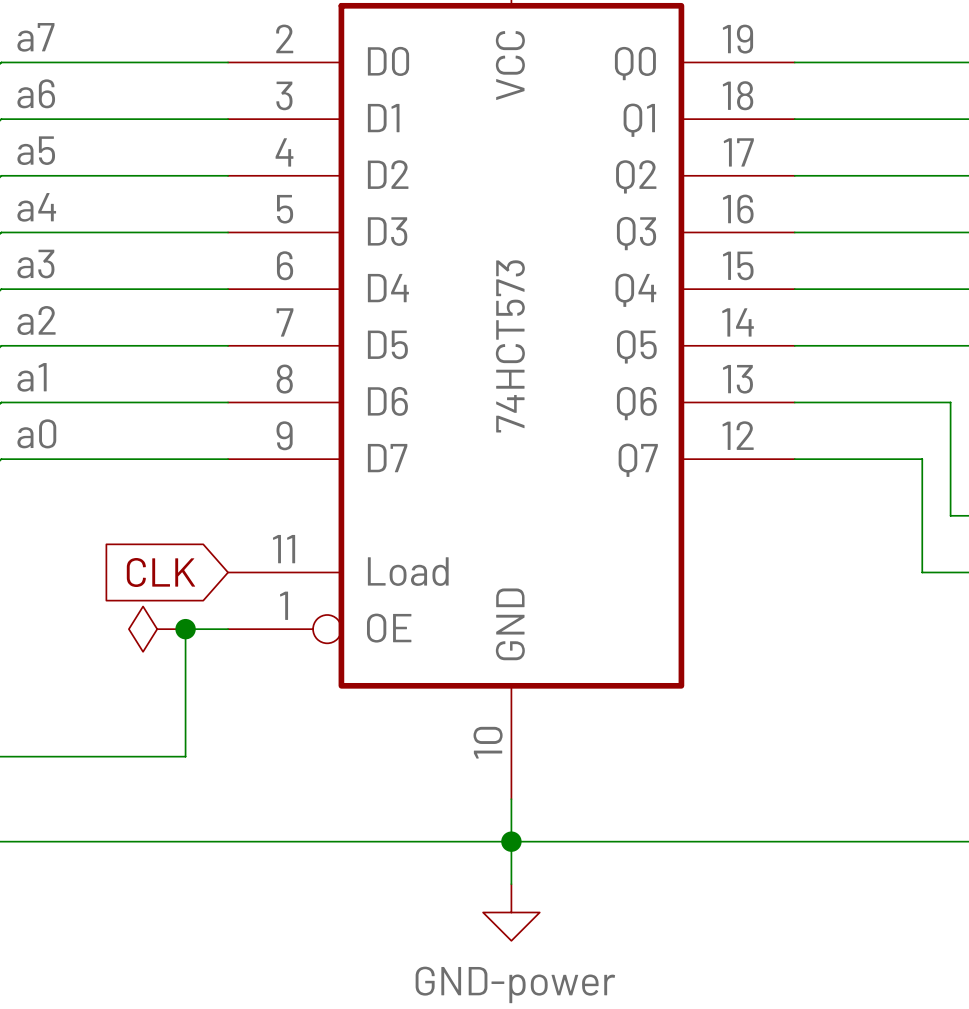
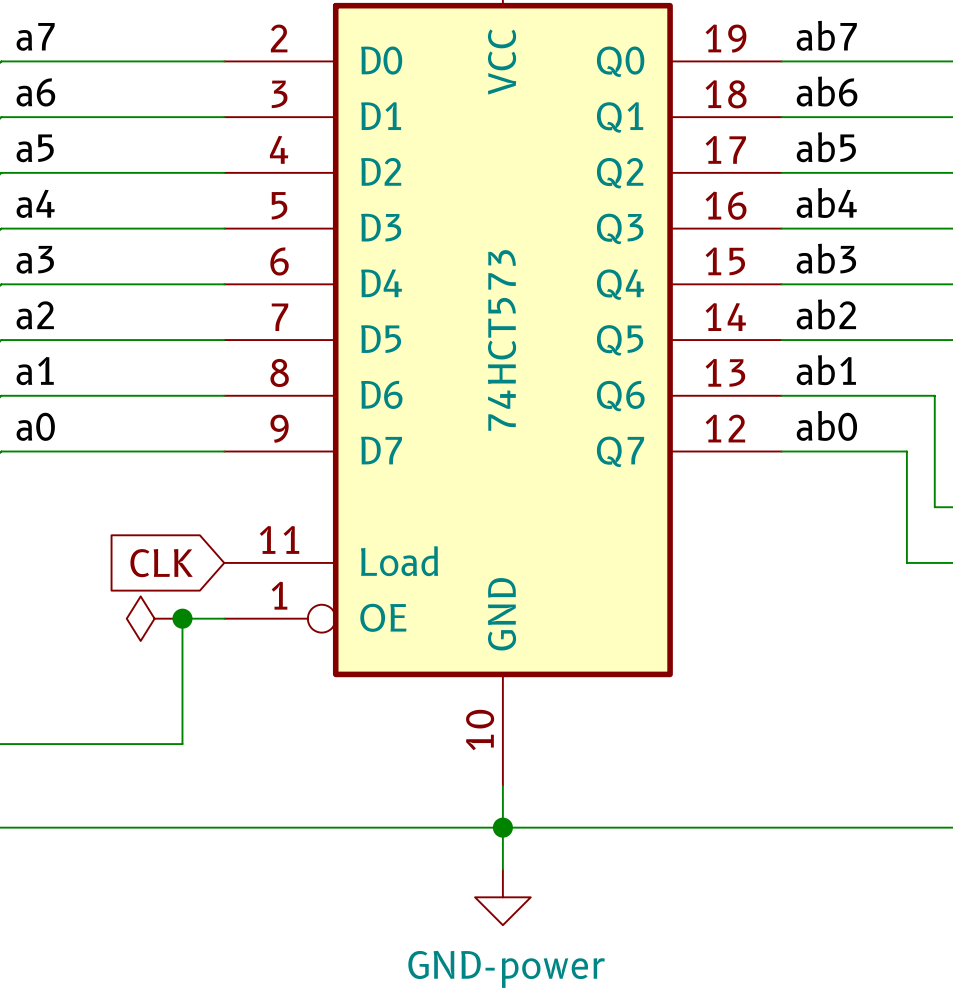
label: none -> ab7 (826, 35)
label: none -> ab6 (827, 91)
label: none -> ab5 (826, 147)
label: none -> ab4 (826, 202)
label: none -> ab3 (826, 258)
label: none -> ab2 (826, 314)
label: none -> ab1 (826, 370)
label: none -> ab0 (826, 425)

